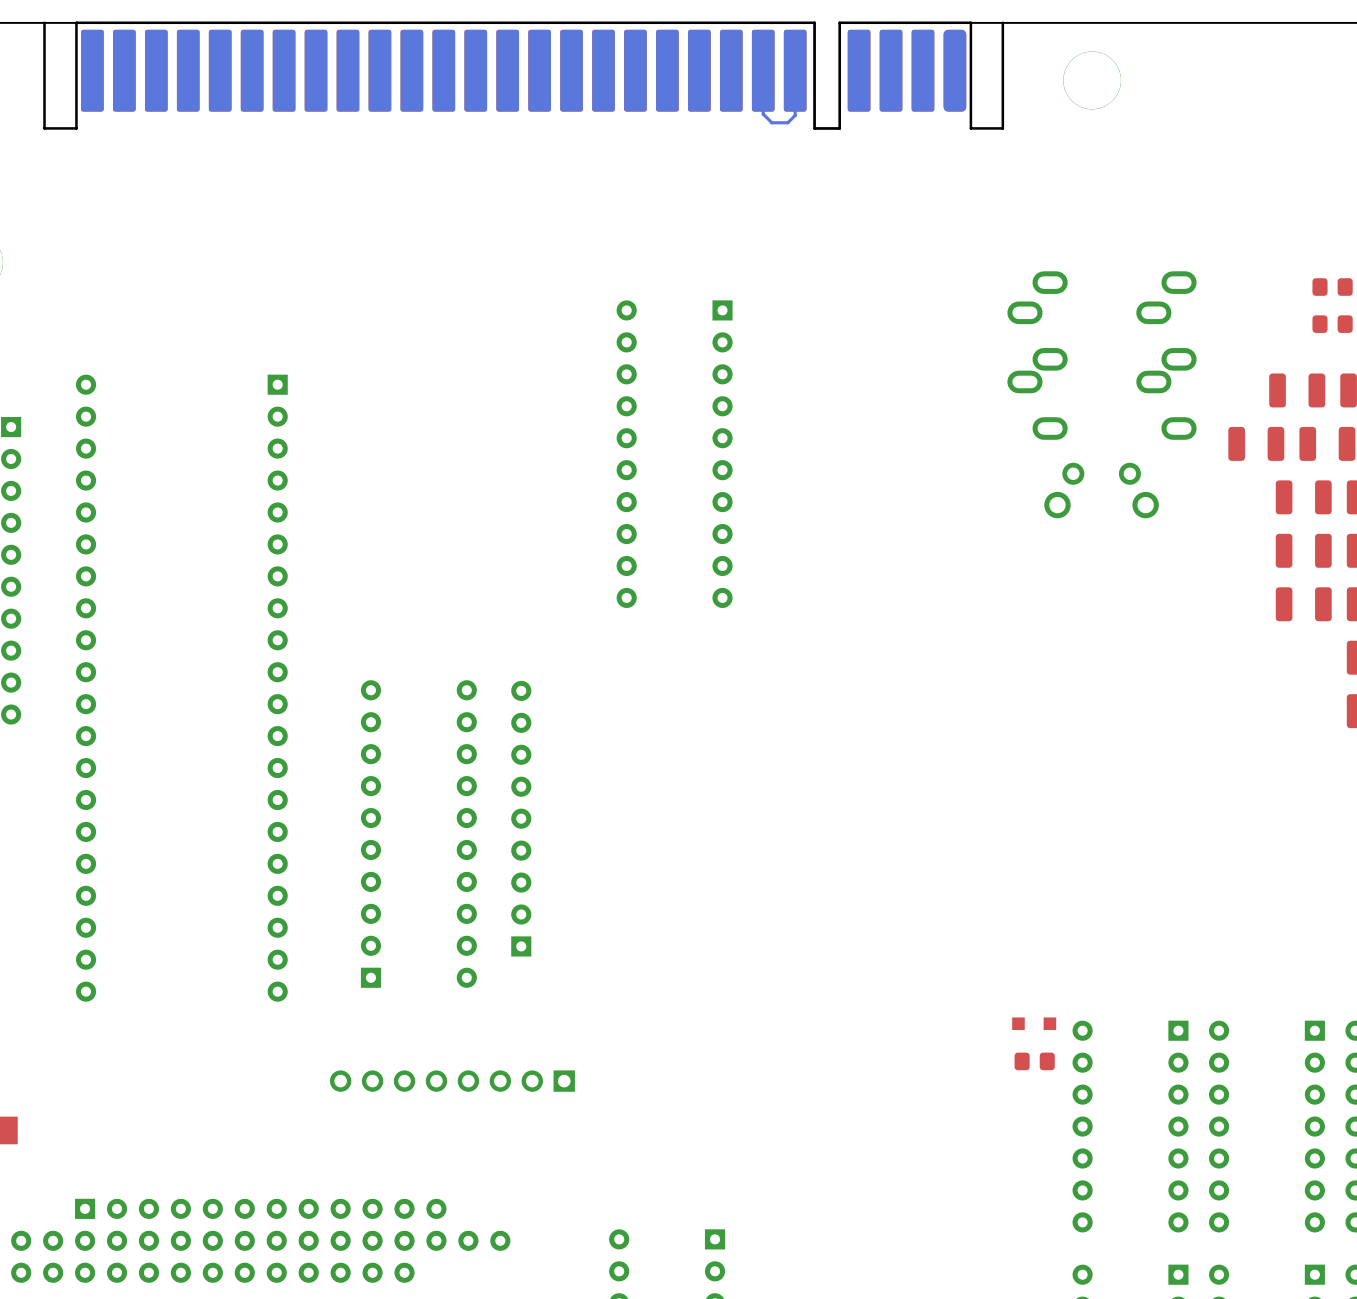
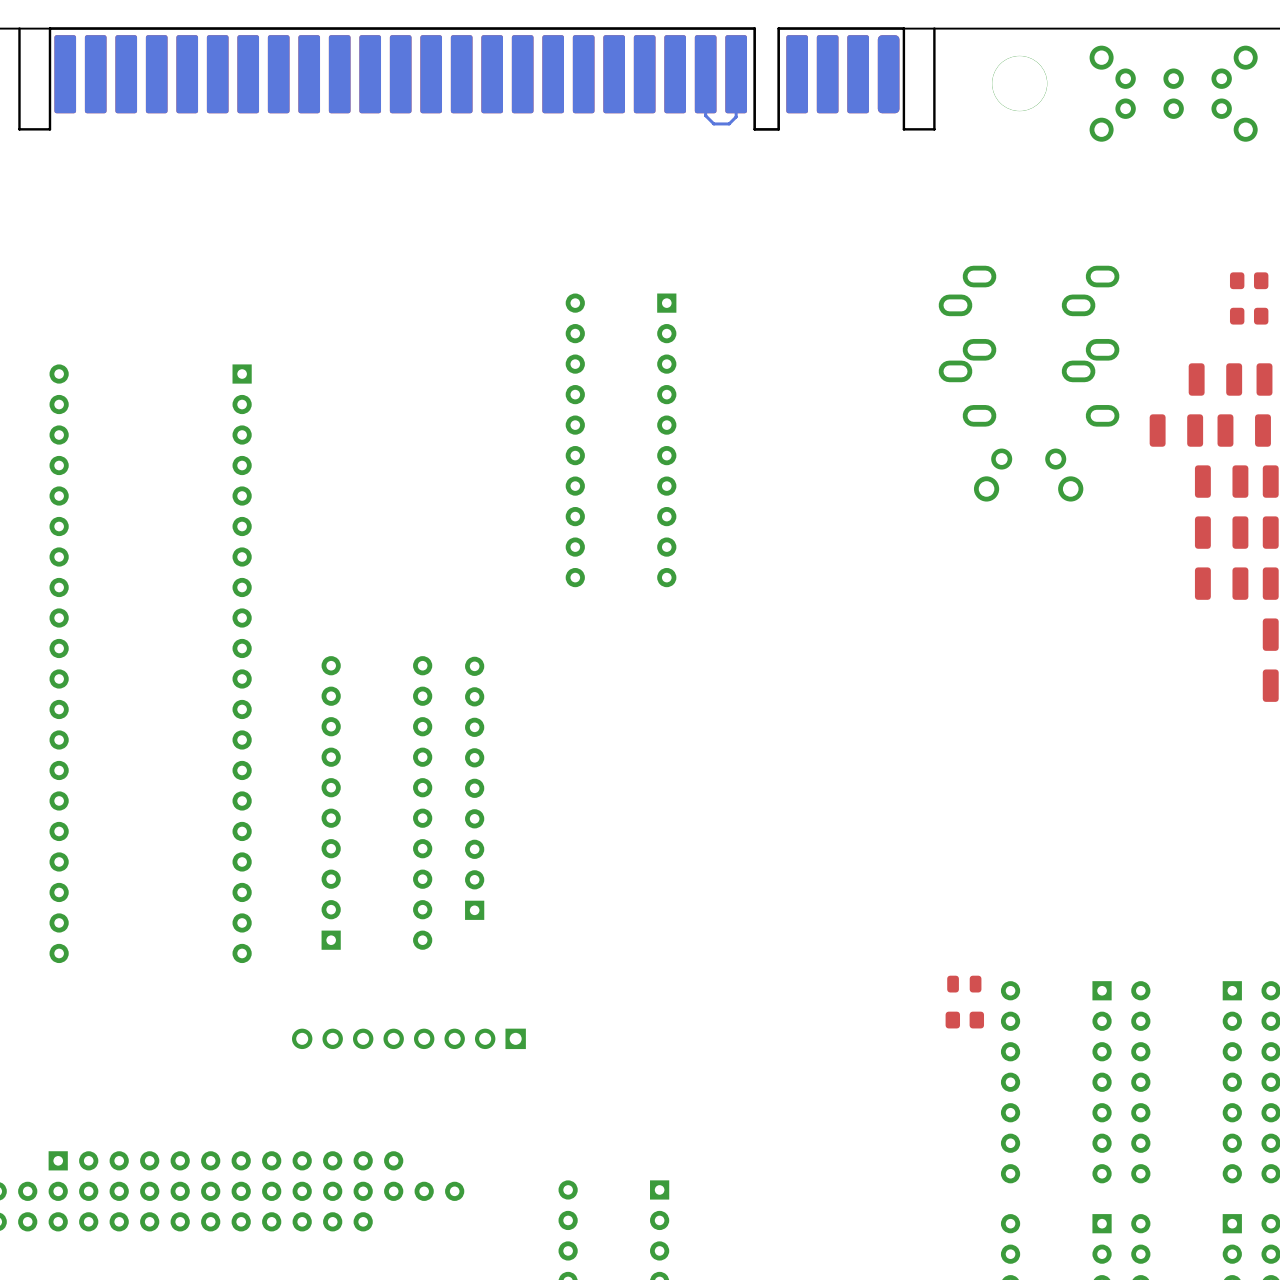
part: none -> (1173, 93)
part footprint: [1012, 1017, 1057, 1031] -> [947, 975, 982, 993]

